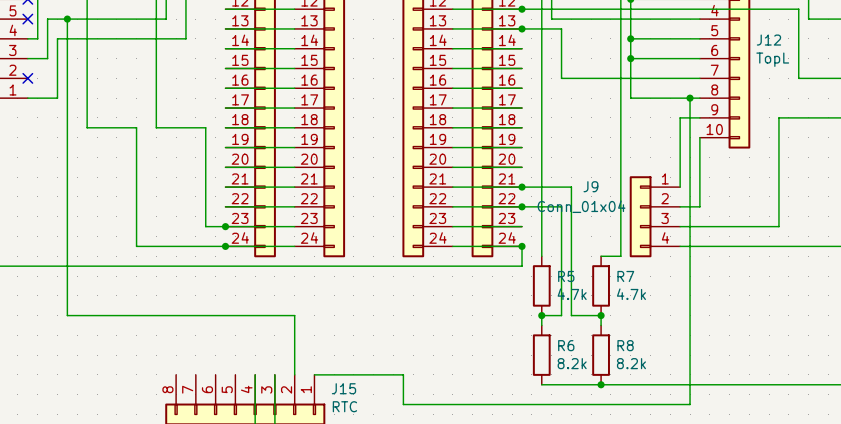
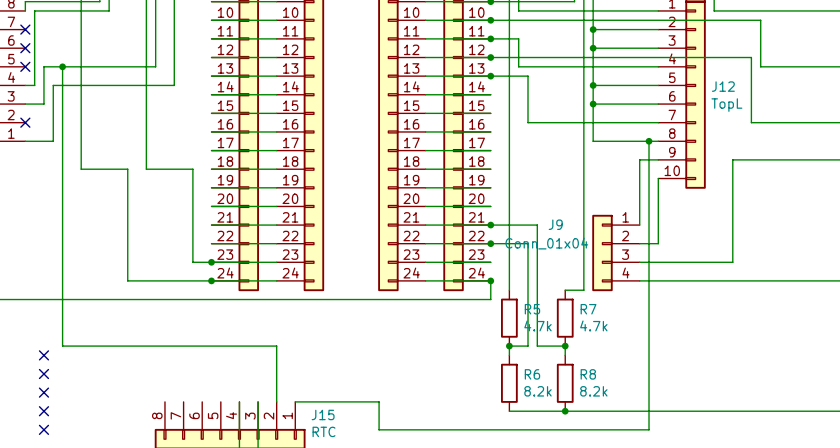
no-connect mark: none -> (43, 355)
no-connect mark: none -> (43, 373)
no-connect mark: none -> (43, 392)
no-connect mark: none -> (43, 411)
no-connect mark: none -> (43, 429)

